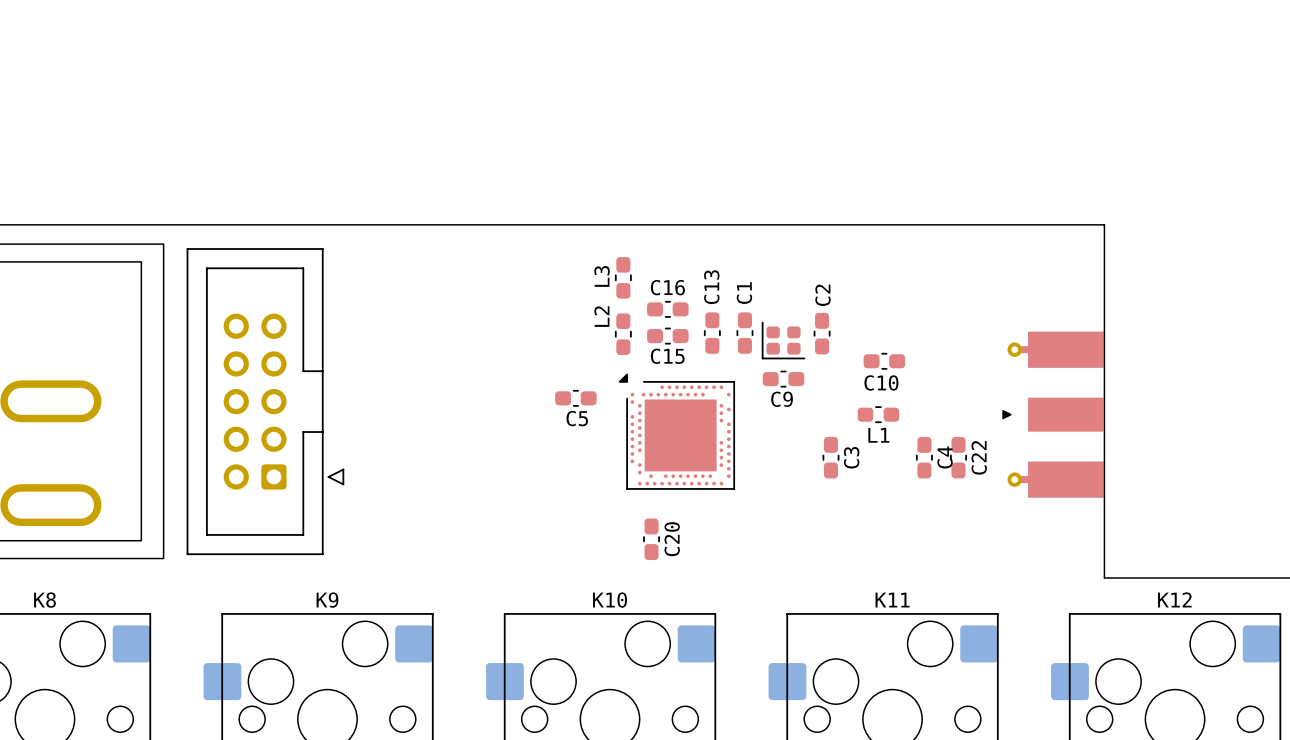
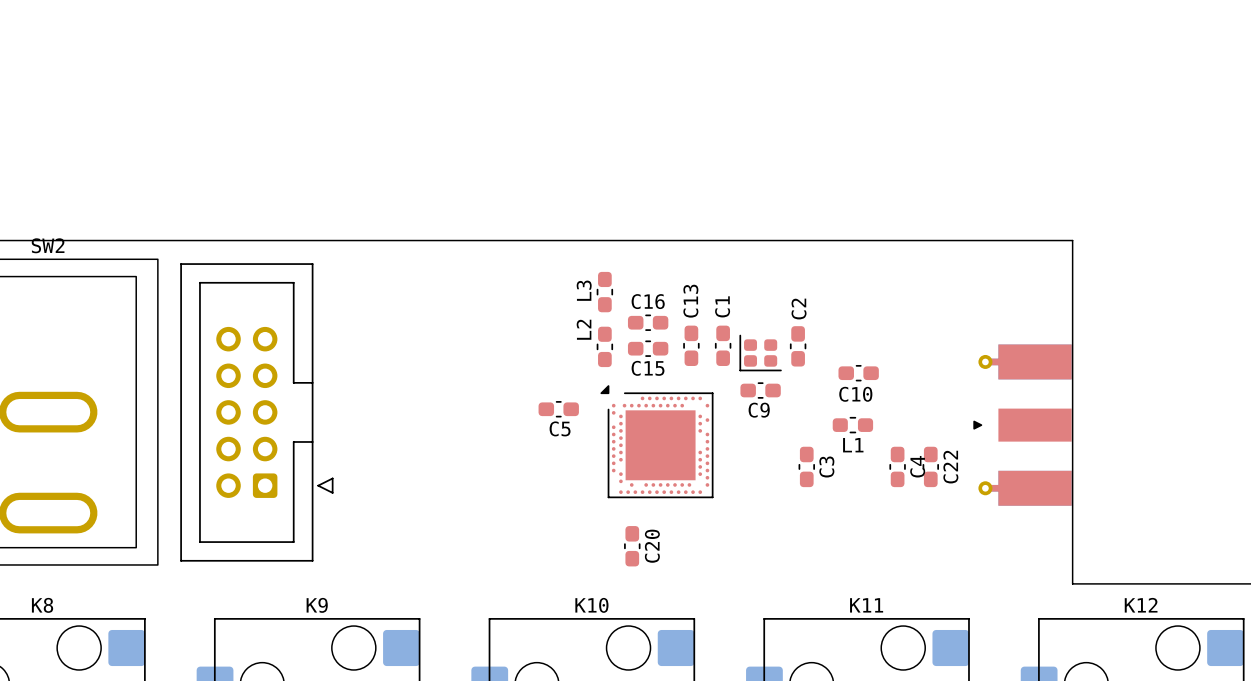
SW2 name: none -> SW2 (48, 245)

